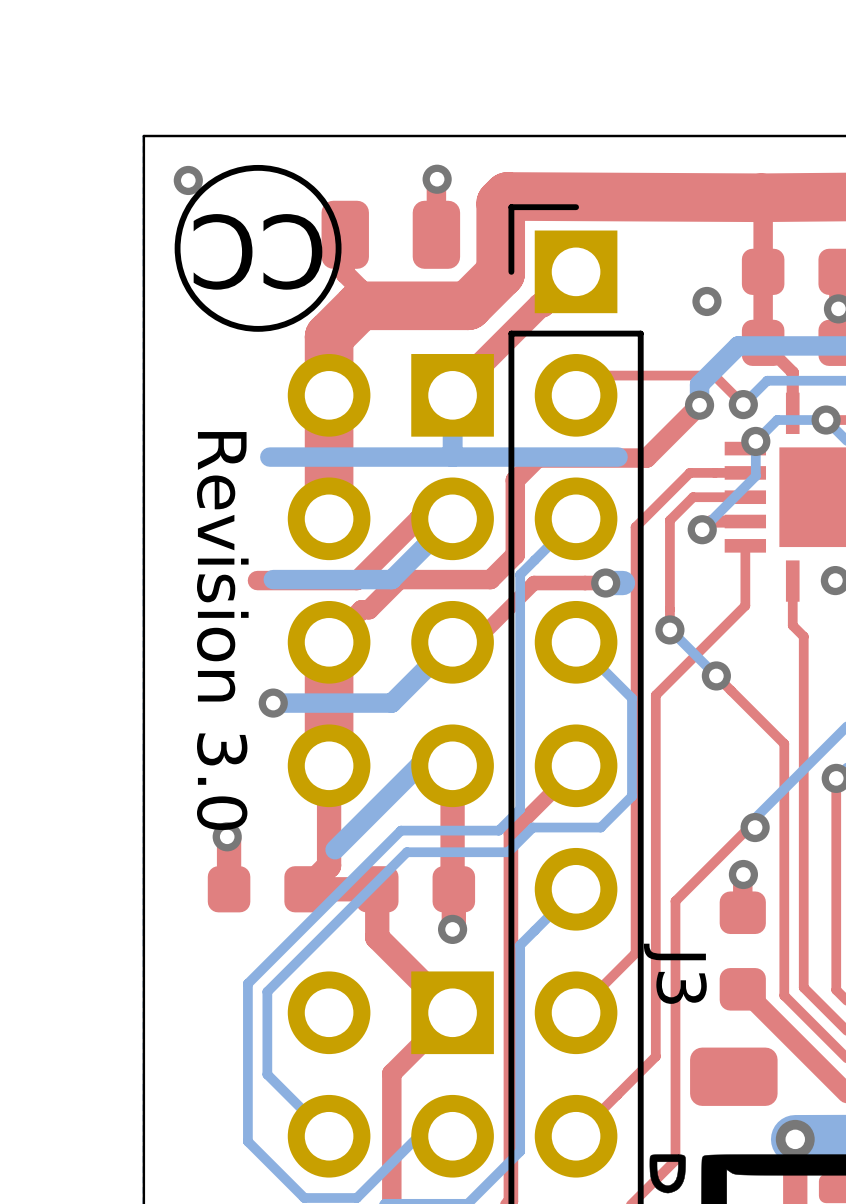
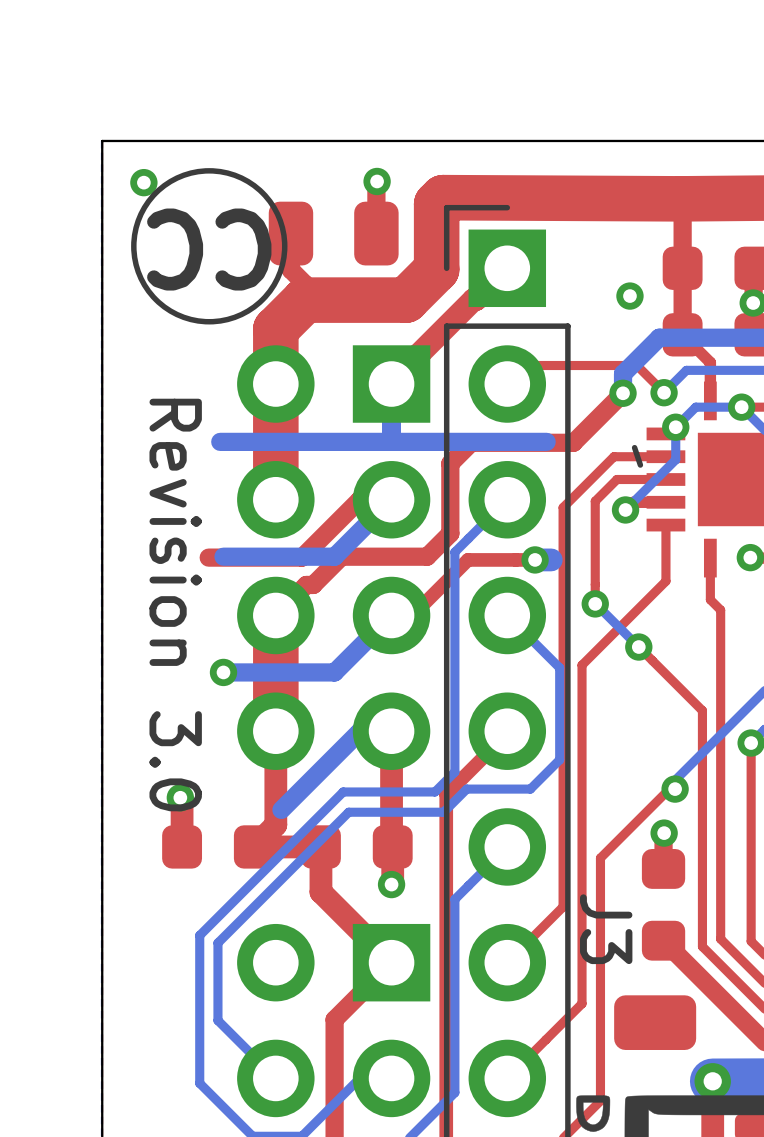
line: none -> (634, 447) (640, 465)

